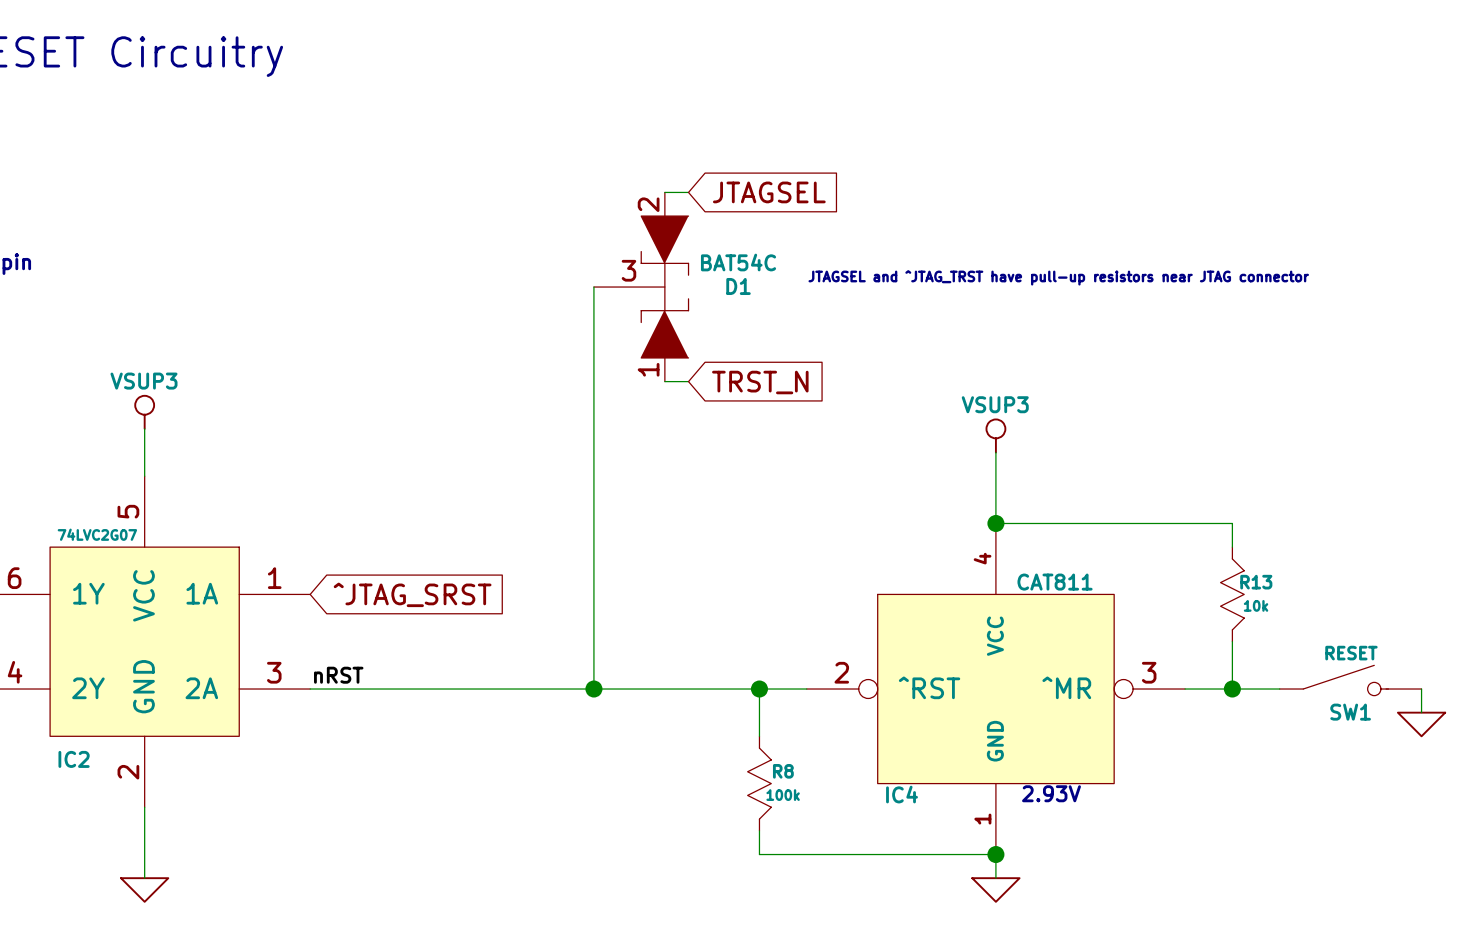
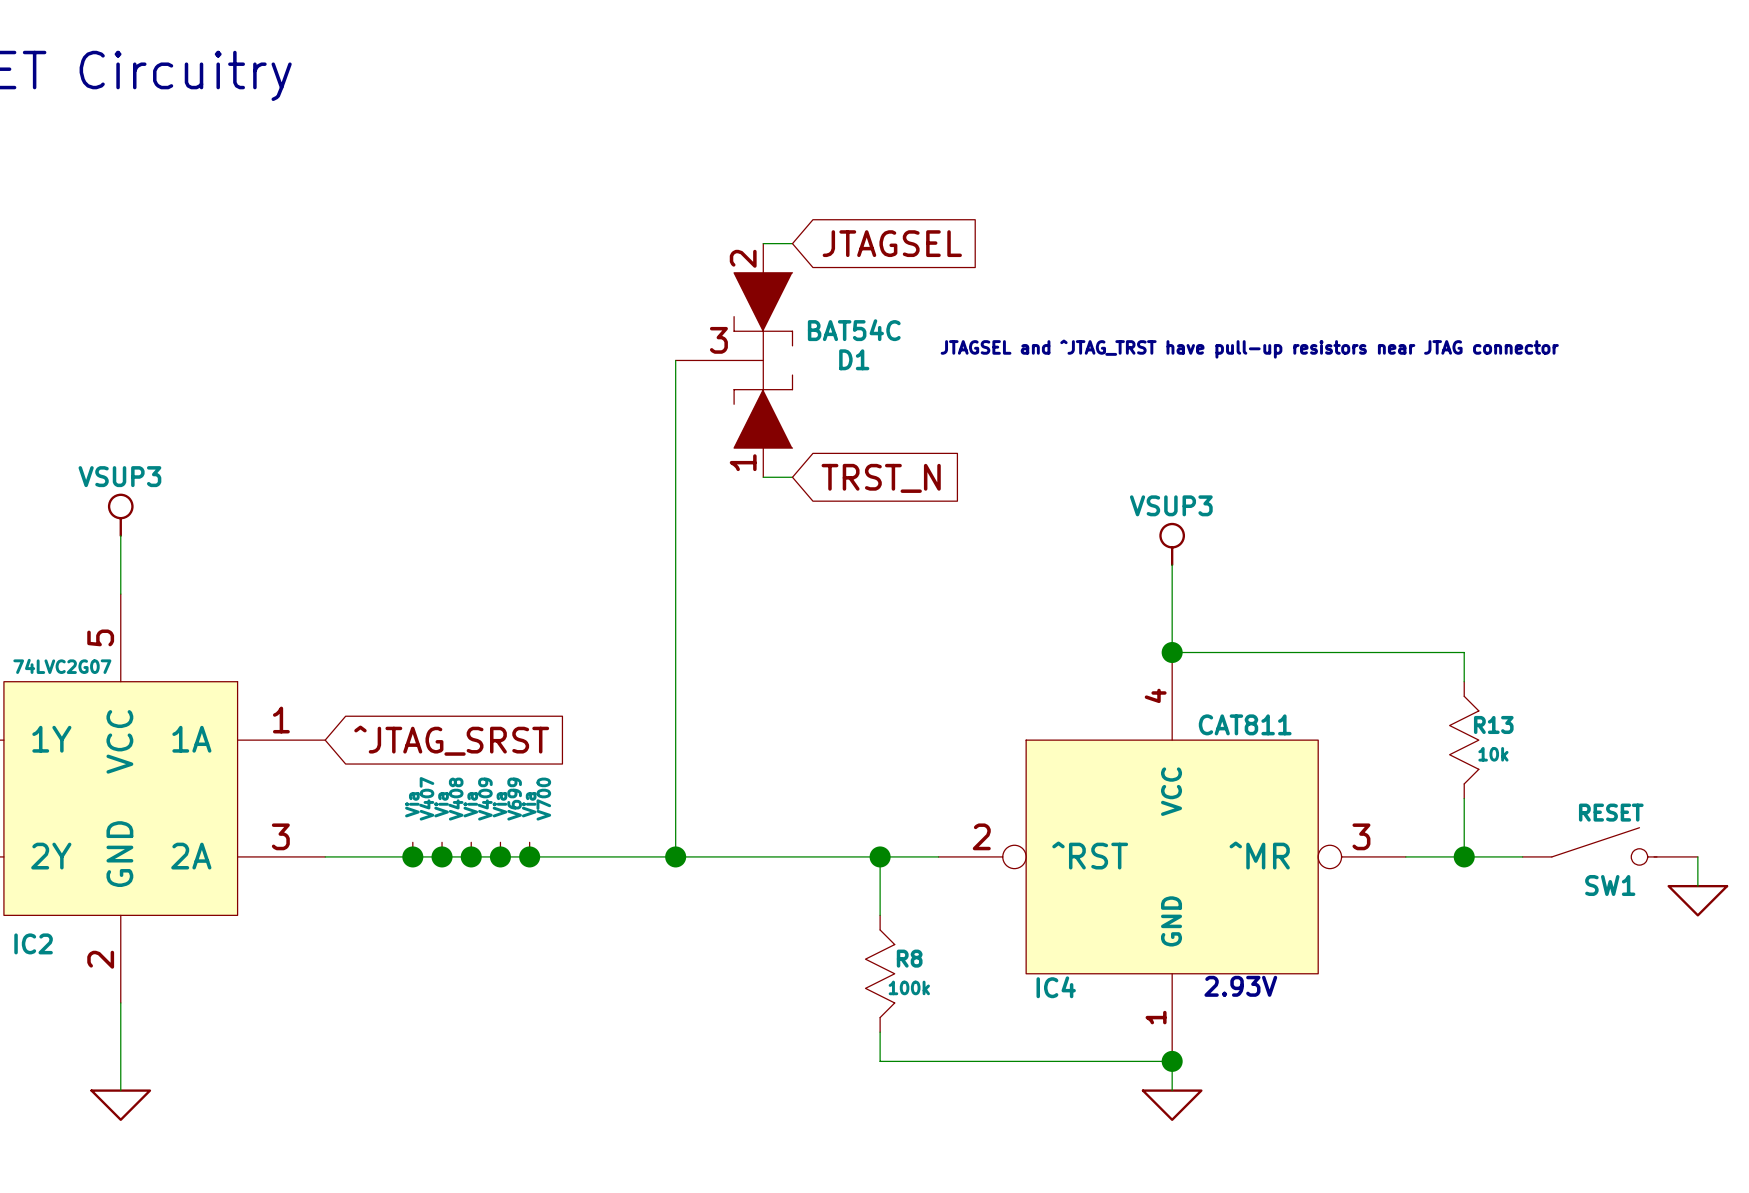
label: nRST (338, 675) -> none
V407: none -> (412, 849)
V408: none -> (442, 849)
V409: none -> (471, 849)
V699: none -> (500, 849)
V700: none -> (529, 849)
junction: none -> (412, 856)
junction: none -> (442, 856)
junction: none -> (471, 856)
junction: none -> (500, 856)
junction: none -> (529, 856)

